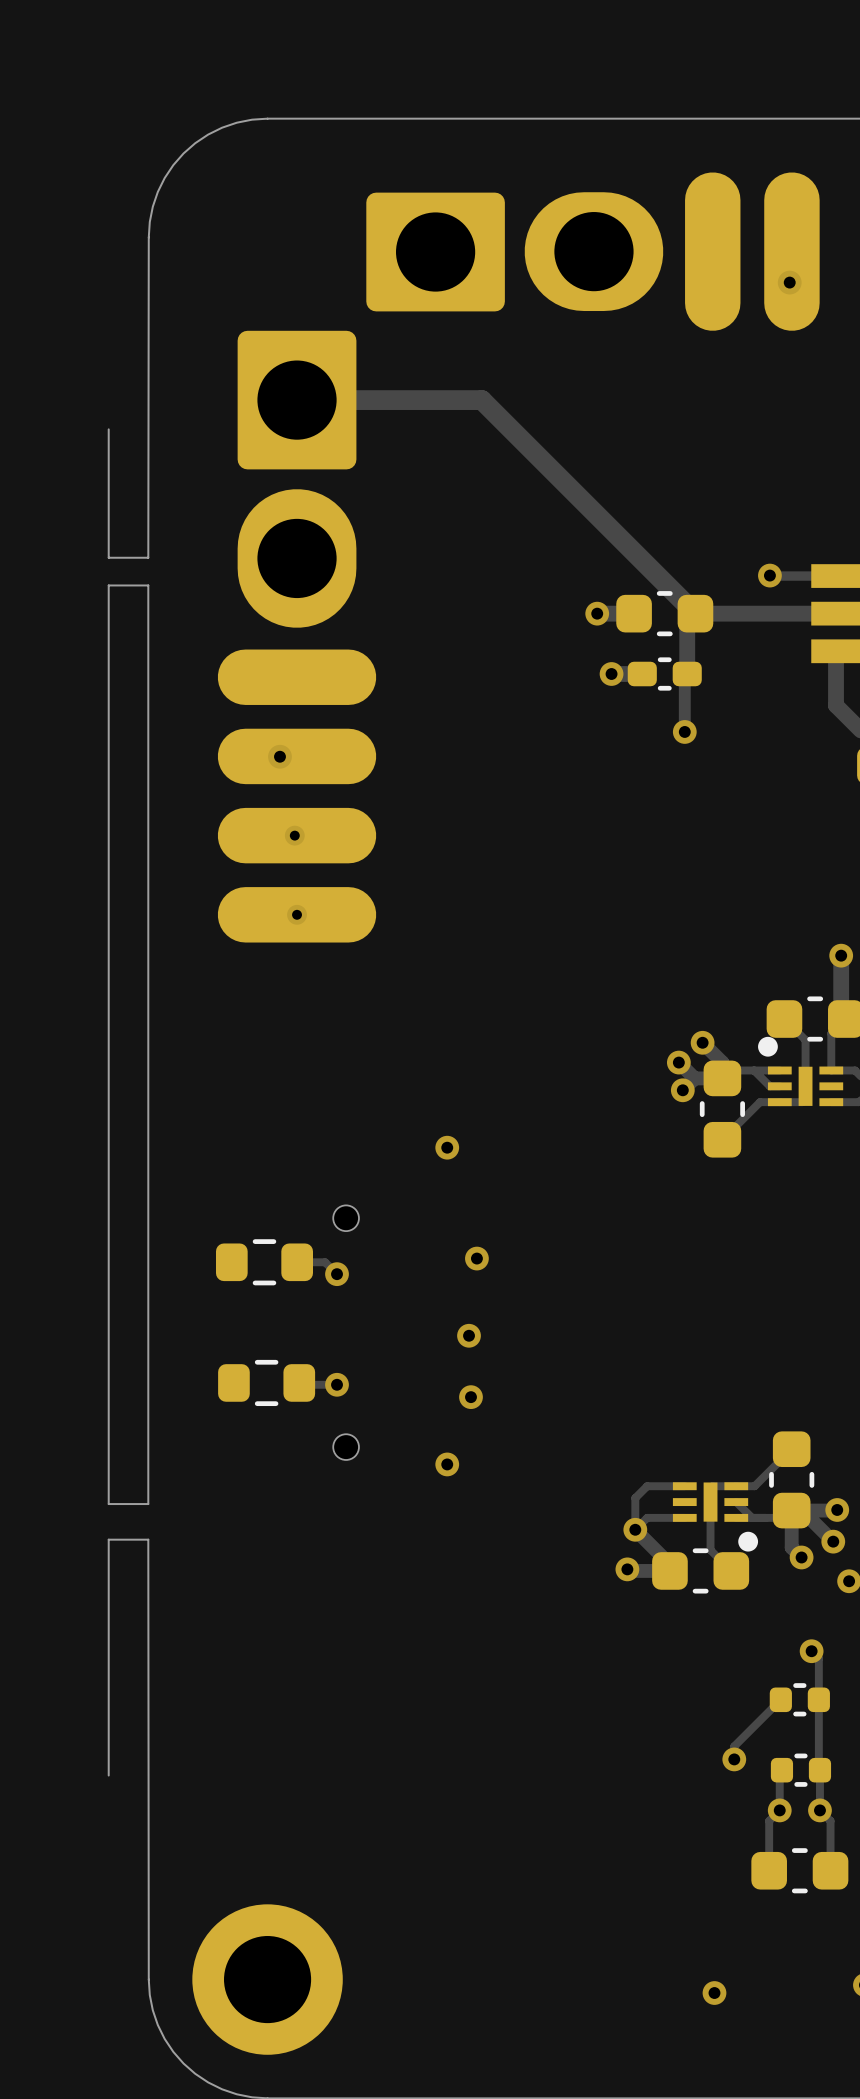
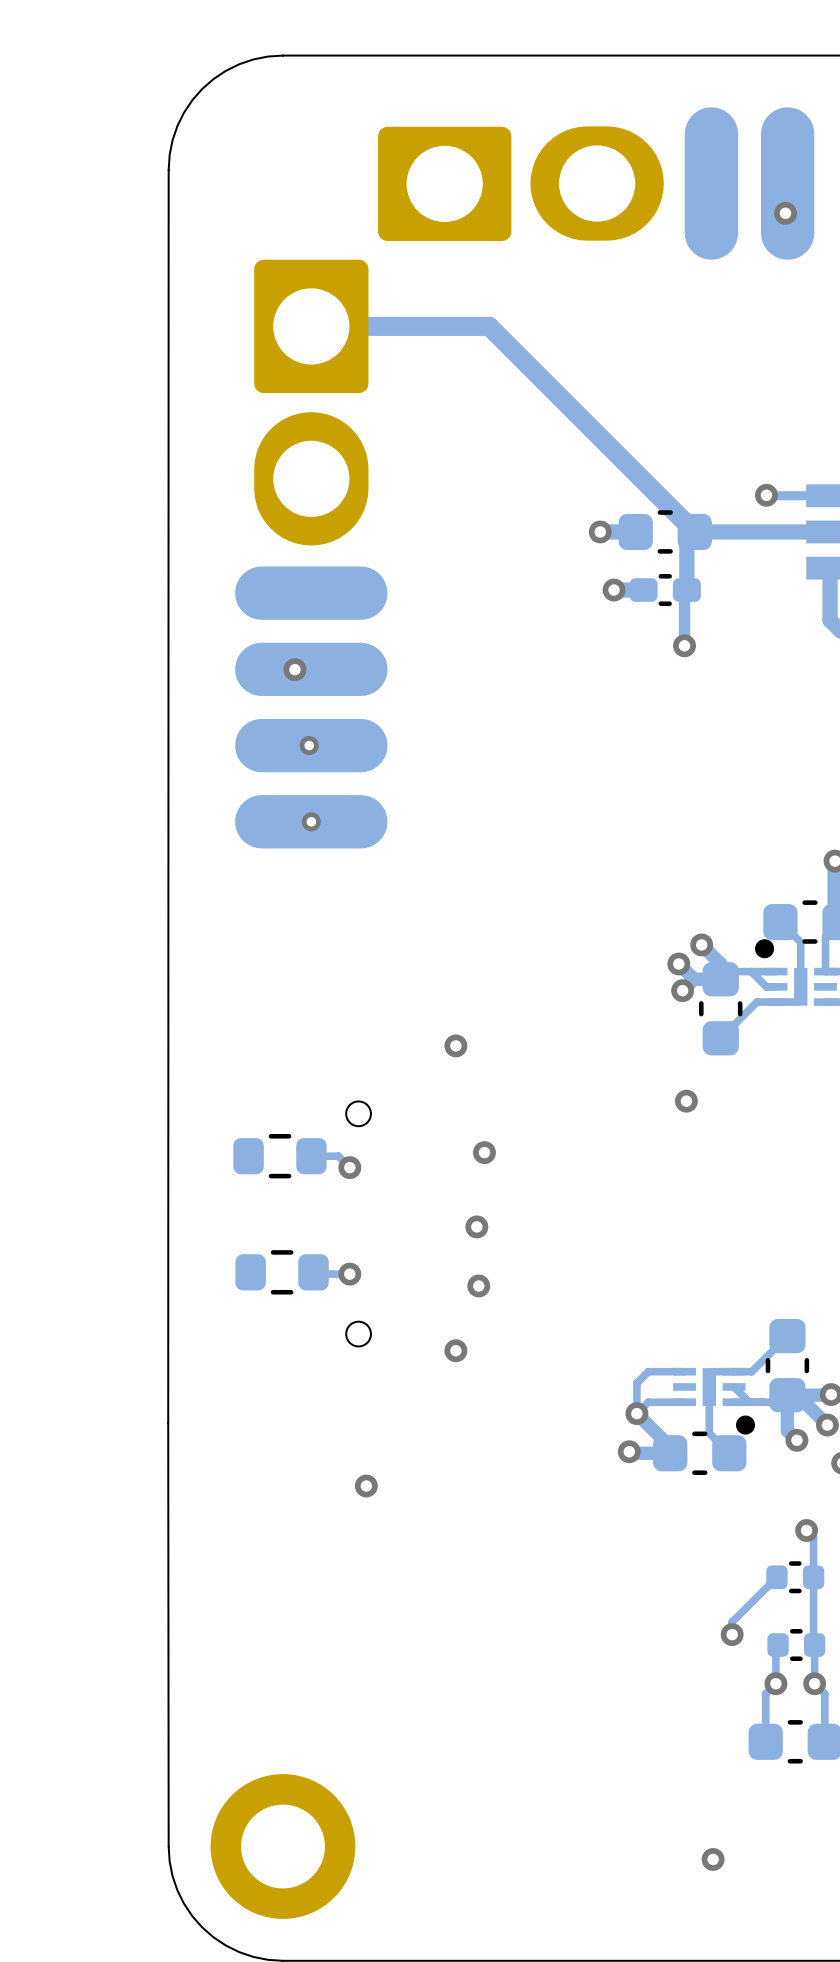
board edge: (148, 237) (148, 557) (108, 557) (108, 429) -> (168, 169) (168, 1423)
board edge: (148, 585) (148, 1504) (108, 1504) (108, 585) (148, 585) -> none
via: none -> (686, 1101)
board edge: (148, 1539) (108, 1539) (108, 1775) -> none
via: none -> (366, 1486)

